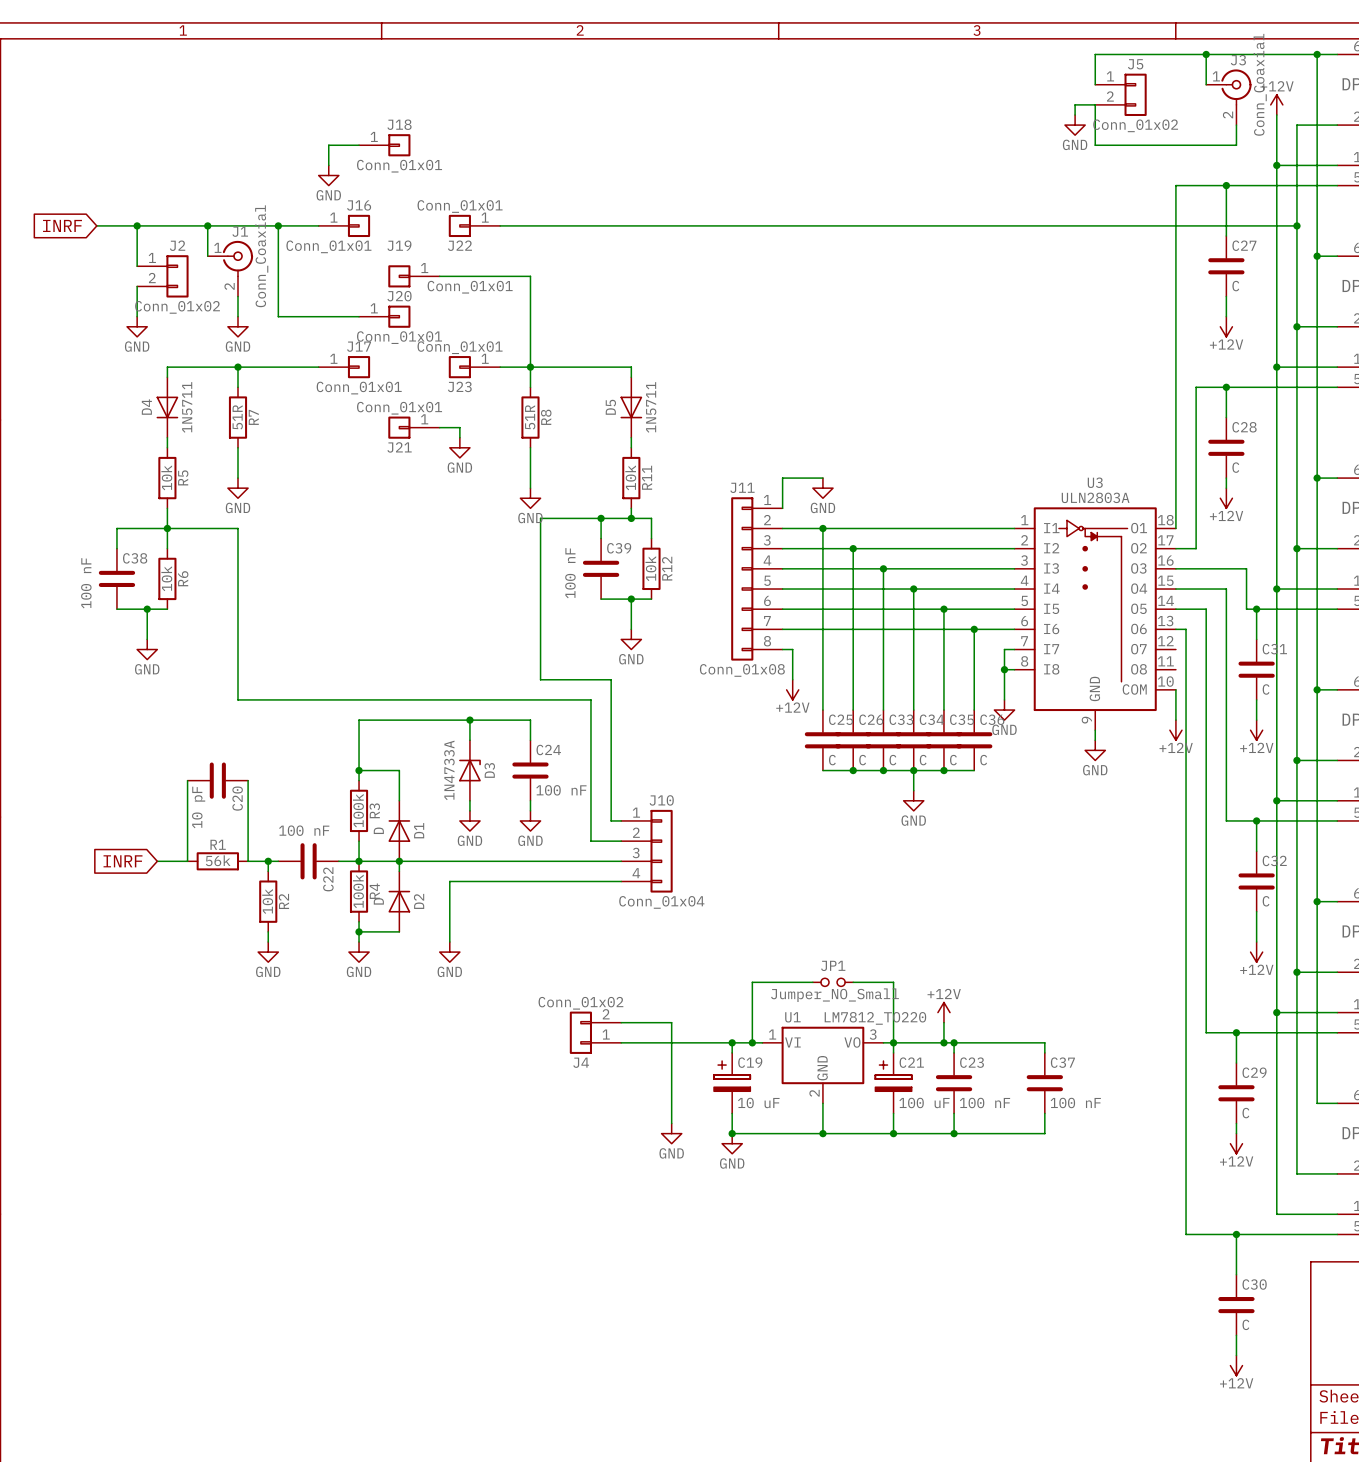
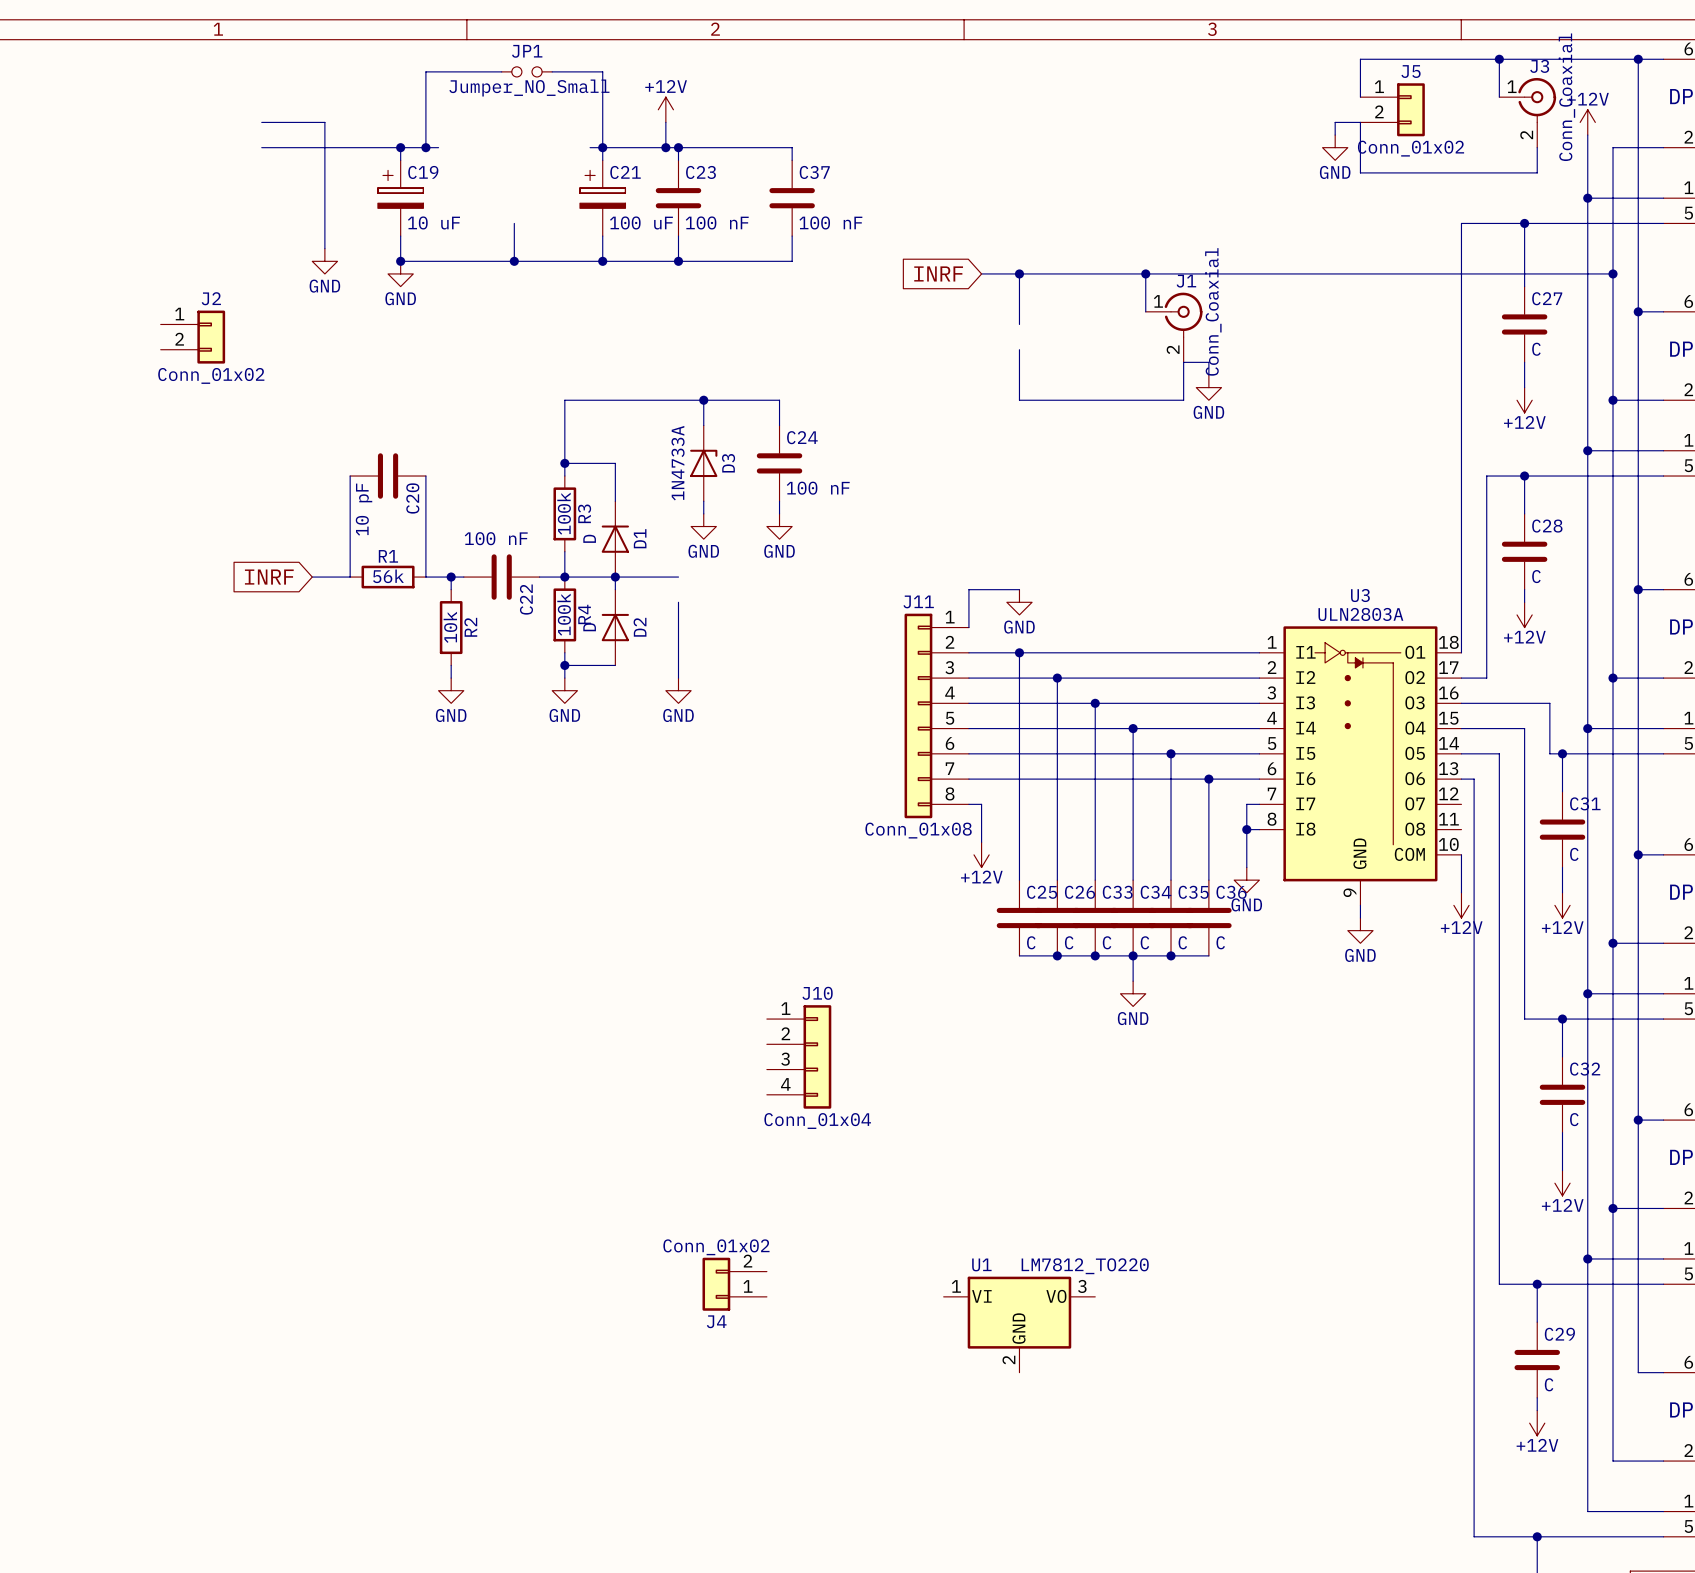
wire: none -> (501, 71) (425, 71) (425, 147)
wire: none -> (552, 71) (602, 71) (602, 160)
power symbol: none -> +12V (665, 109)
wire: none -> (261, 122) (324, 122) (324, 248)
wire: none -> (665, 122) (665, 147)
wire: none -> (261, 147) (438, 147)
wire: none -> (400, 147) (400, 160)
junction: none -> (400, 147)
junction: none -> (425, 147)
wire: none -> (590, 147) (792, 147) (792, 160)
junction: none -> (602, 147)
junction: none -> (665, 147)
wire: none -> (678, 147) (678, 160)
junction: none -> (678, 147)
wire: (359, 145) (328, 145) (328, 165) -> none
J18: Conn_01x01 (384, 145) -> none
power symbol: GND (328, 175) -> none
wire: none -> (514, 223) (514, 261)
wire: none -> (400, 236) (400, 261) (792, 261) (792, 236)
wire: none -> (602, 236) (602, 261)
wire: none -> (678, 236) (678, 261)
power symbol: none -> GND (324, 261)
junction: none -> (400, 261)
junction: none -> (514, 261)
junction: none -> (602, 261)
junction: none -> (678, 261)
global label: INRF (62, 225) -> none
wire: (96, 225) (318, 225) -> none
wire: (137, 225) (137, 266) -> none
junction: (137, 225) -> none
wire: (207, 225) (207, 256) -> none
junction: (207, 225) -> none
wire: (278, 225) (278, 316) (359, 316) -> none
junction: (278, 225) -> none
power symbol: none -> GND (400, 273)
J16: Conn_01x01 (344, 225) -> none
J22: Conn_01x01 (474, 225) -> none
wire: (500, 225) (792, 225) -> none
global label: none -> INRF (938, 273)
wire: none -> (1019, 273) (1019, 324)
junction: none -> (1019, 273)
wire: none -> (1145, 273) (1145, 311)
junction: none -> (1145, 273)
J1 position: (230, 268) -> (1174, 327)
J19: Conn_01x01 (413, 276) -> none
wire: (439, 276) (530, 276) (530, 387) -> none
wire: (137, 286) (137, 316) -> none
wire: none -> (1019, 349) (1019, 400) (1183, 400) (1183, 362) (1208, 362) (1208, 374)
wire: (237, 296) (237, 316) -> none
J20: Conn_01x01 (384, 316) -> none
power symbol: none -> GND (1208, 387)
power symbol: GND (137, 326) -> none
power symbol: GND (237, 326) -> none
wire: none -> (703, 400) (703, 425)
junction: none -> (703, 400)
wire: none -> (779, 425) (779, 400) (564, 400) (564, 476)
wire: (237, 367) (237, 387) -> none
junction: (237, 367) -> none
wire: (318, 367) (167, 367) (167, 377) -> none
J17: Conn_01x01 (344, 367) -> none
J23: Conn_01x01 (474, 367) -> none
wire: (500, 367) (631, 367) (631, 377) -> none
junction: (530, 367) -> none
wire: none -> (564, 463) (615, 463) (615, 501)
junction: none -> (564, 463)
wire: none -> (350, 476) (350, 577) (312, 577)
wire: none -> (425, 476) (425, 577) (463, 577)
D4: 1N5711 (167, 407) -> none
D5: 1N5711 (631, 407) -> none
R7: 51R (237, 417) -> none
R8: 51R (530, 417) -> none
J21: Conn_01x01 (413, 427) -> none
wire: (439, 427) (459, 427) (459, 437) -> none
power symbol: none -> GND (703, 526)
power symbol: none -> GND (779, 526)
wire: (167, 437) (167, 447) -> none
wire: (237, 447) (237, 478) -> none
wire: none -> (564, 551) (564, 577)
power symbol: GND (459, 447) -> none
wire: (530, 447) (530, 488) -> none
global label: none -> INRF (269, 577)
wire: none -> (451, 577) (451, 589)
junction: none -> (451, 577)
wire: none -> (539, 577) (678, 577)
junction: none -> (564, 577)
wire: none -> (615, 577) (615, 589)
junction: none -> (615, 577)
R5: 10k (167, 478) -> none
R11: 10k (631, 478) -> none
power symbol: GND (237, 488) -> none
wire: none -> (678, 602) (678, 678)
power symbol: GND (530, 498) -> none
wire: (167, 508) (167, 548) -> none
wire: (631, 508) (631, 518) -> (703, 501) (703, 513)
wire: (601, 518) (601, 538) -> (564, 652) (564, 678)
junction: (601, 518) -> none
junction: (631, 518) -> none
junction: (167, 528) -> none
wire: none -> (451, 665) (451, 678)
wire: none -> (564, 665) (615, 665)
junction: none -> (564, 665)
wire: (651, 538) (651, 518) (540, 518) (540, 679) (611, 679) (611, 820) (621, 820) -> none
wire: (116, 548) (116, 528) (237, 528) (237, 699) (590, 699) (590, 841) (621, 841) -> none
power symbol: none -> GND (451, 690)
power symbol: none -> GND (564, 690)
power symbol: none -> GND (678, 690)
C39: 100 nF (601, 568) -> none
R12: 10k (651, 568) -> none
C38: 100 nF (116, 578) -> none
R6: 10k (167, 578) -> none
wire: (601, 599) (651, 599) -> none
wire: (631, 599) (631, 629) -> none
junction: (631, 599) -> none
wire: (116, 609) (167, 609) -> none
wire: (147, 609) (147, 639) -> none
junction: (147, 609) -> none
power symbol: GND (631, 639) -> none
power symbol: GND (147, 649) -> none
wire: (469, 720) (469, 740) -> none
junction: (469, 720) -> none
wire: (530, 740) (530, 720) (359, 720) (359, 780) -> none
wire: (359, 770) (399, 770) (399, 800) -> none
junction: (359, 770) -> none
D3 position: (469, 770) -> (703, 463)
C24 position: (530, 770) -> (779, 463)
wire: (187, 780) (187, 861) (157, 861) -> none
C20 position: (217, 780) -> (388, 476)
wire: (248, 780) (248, 861) (278, 861) -> none
wire: (469, 800) (469, 810) -> none
wire: (530, 800) (530, 810) -> none
R3 position: (359, 810) -> (564, 513)
power symbol: GND (469, 820) -> none
power symbol: GND (530, 820) -> none
D1 position: (399, 831) -> (615, 539)
wire: (359, 841) (359, 861) -> none
global label: INRF (123, 861) -> none
R1 position: (217, 861) -> (388, 577)
wire: (268, 861) (268, 871) -> none
junction: (268, 861) -> none
C22 position: (308, 861) -> (501, 577)
wire: (338, 861) (621, 861) -> none
junction: (359, 861) -> none
wire: (399, 861) (399, 871) -> none
junction: (399, 861) -> none
wire: (621, 881) (449, 881) (449, 941) -> none
R4 position: (359, 891) -> (564, 614)
R2 position: (268, 901) -> (451, 627)
D2 position: (399, 901) -> (615, 627)
wire: (359, 921) (359, 941) -> none
wire: (268, 931) (268, 941) -> none
wire: (359, 931) (399, 931) -> none
junction: (359, 931) -> none
power symbol: GND (268, 952) -> none
power symbol: GND (359, 952) -> none
power symbol: GND (449, 952) -> none
wire: (812, 982) (752, 982) (752, 1042) -> none
JP1 position: (833, 982) -> (526, 71)
wire: (853, 982) (893, 982) (893, 1052) -> none
power symbol: +12V (943, 1012) -> none
wire: (621, 1022) (671, 1022) (671, 1123) -> none
wire: (943, 1022) (943, 1042) -> none
wire: (621, 1042) (762, 1042) -> none
wire: (732, 1042) (732, 1052) -> none
junction: (732, 1042) -> none
junction: (752, 1042) -> none
wire: (883, 1042) (1044, 1042) (1044, 1052) -> none
junction: (893, 1042) -> none
junction: (943, 1042) -> none
wire: (954, 1042) (954, 1052) -> none
junction: (954, 1042) -> none
C19 position: (732, 1083) -> (400, 198)
C21 position: (893, 1083) -> (602, 198)
C23 position: (954, 1083) -> (678, 198)
C37 position: (1044, 1083) -> (792, 198)
wire: (822, 1103) (822, 1133) -> none
wire: (732, 1113) (732, 1133) (1044, 1133) (1044, 1113) -> none
wire: (893, 1113) (893, 1133) -> none
wire: (954, 1113) (954, 1133) -> none
power symbol: GND (671, 1133) -> none
junction: (732, 1133) -> none
junction: (822, 1133) -> none
junction: (893, 1133) -> none
junction: (954, 1133) -> none
power symbol: GND (732, 1143) -> none

